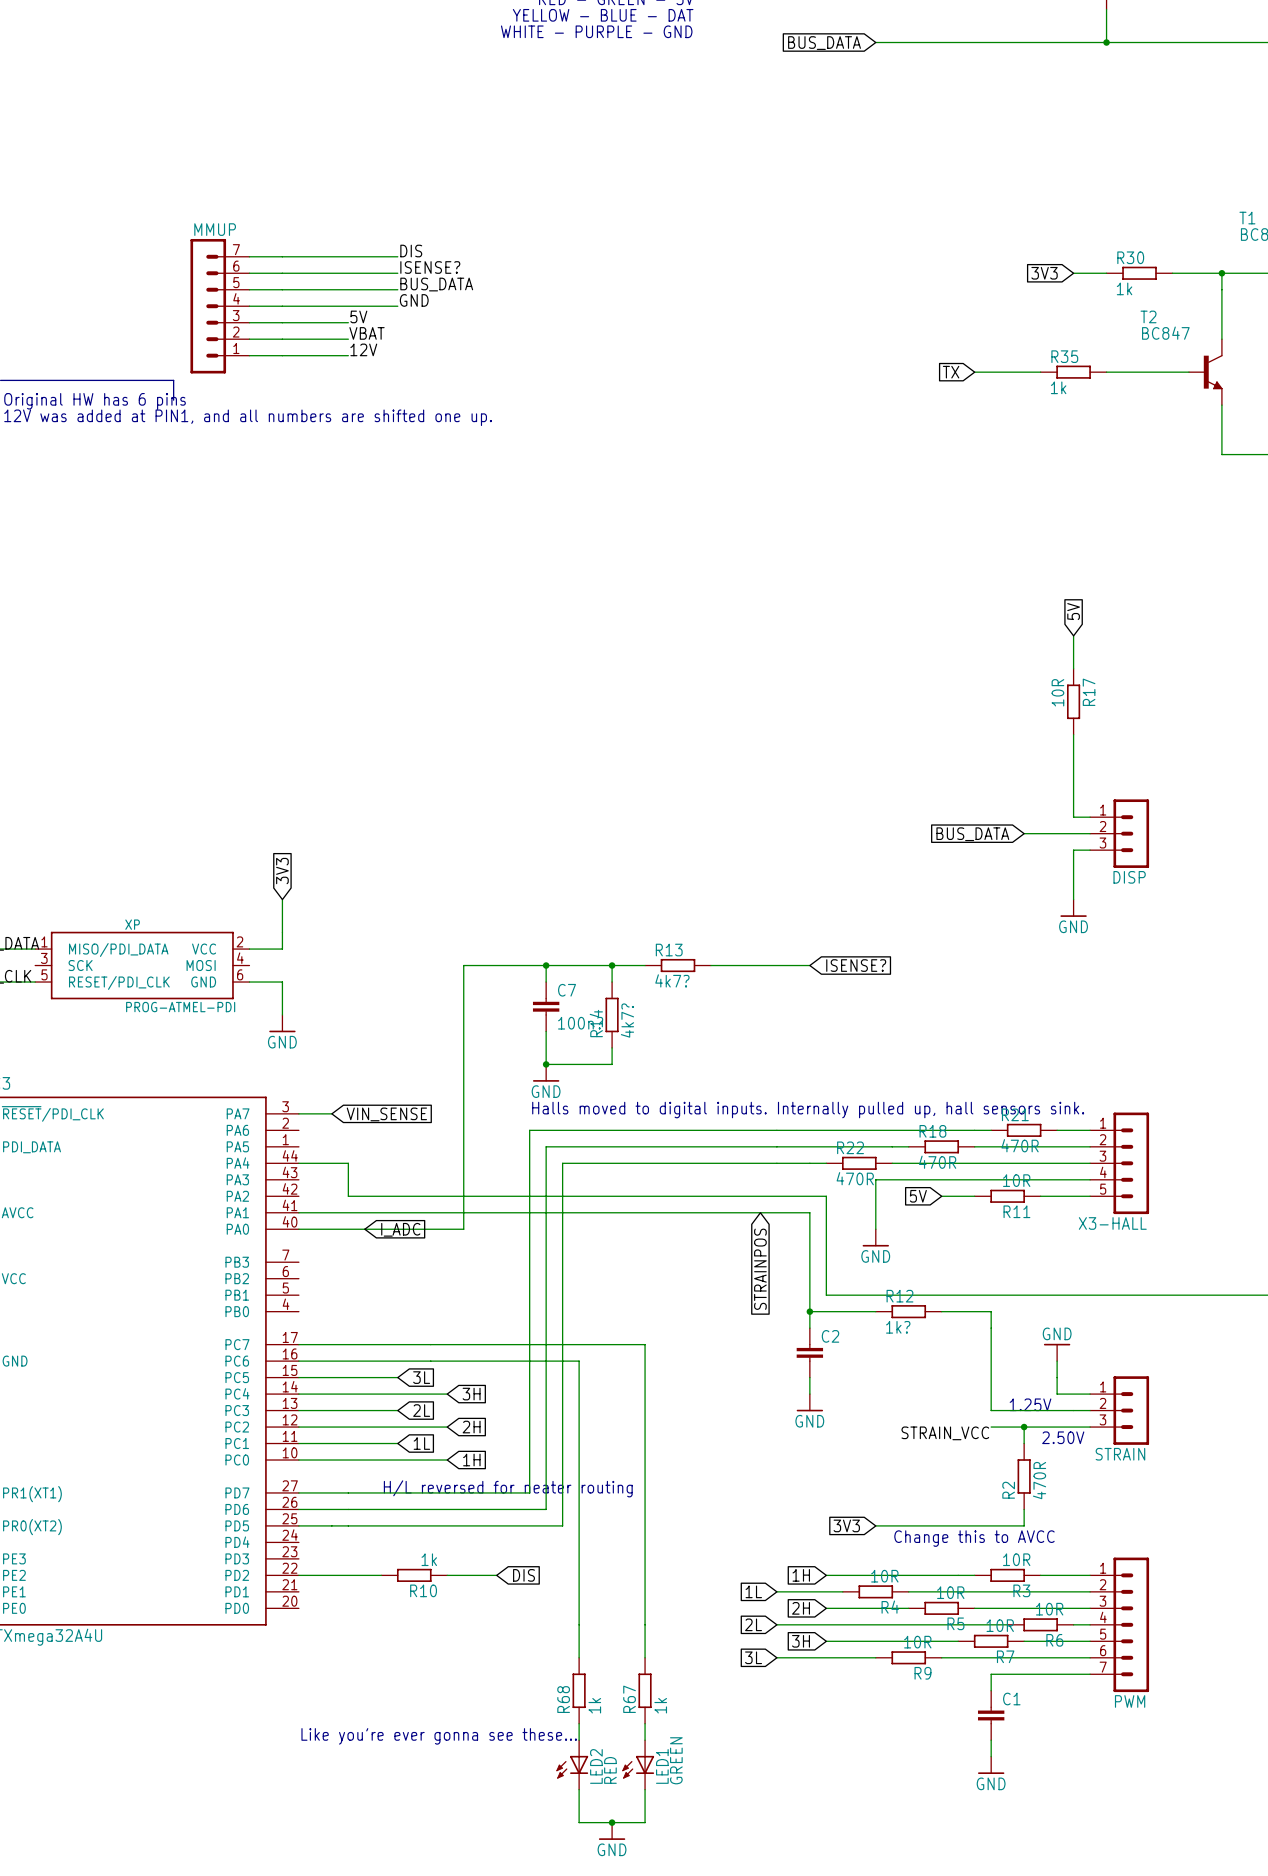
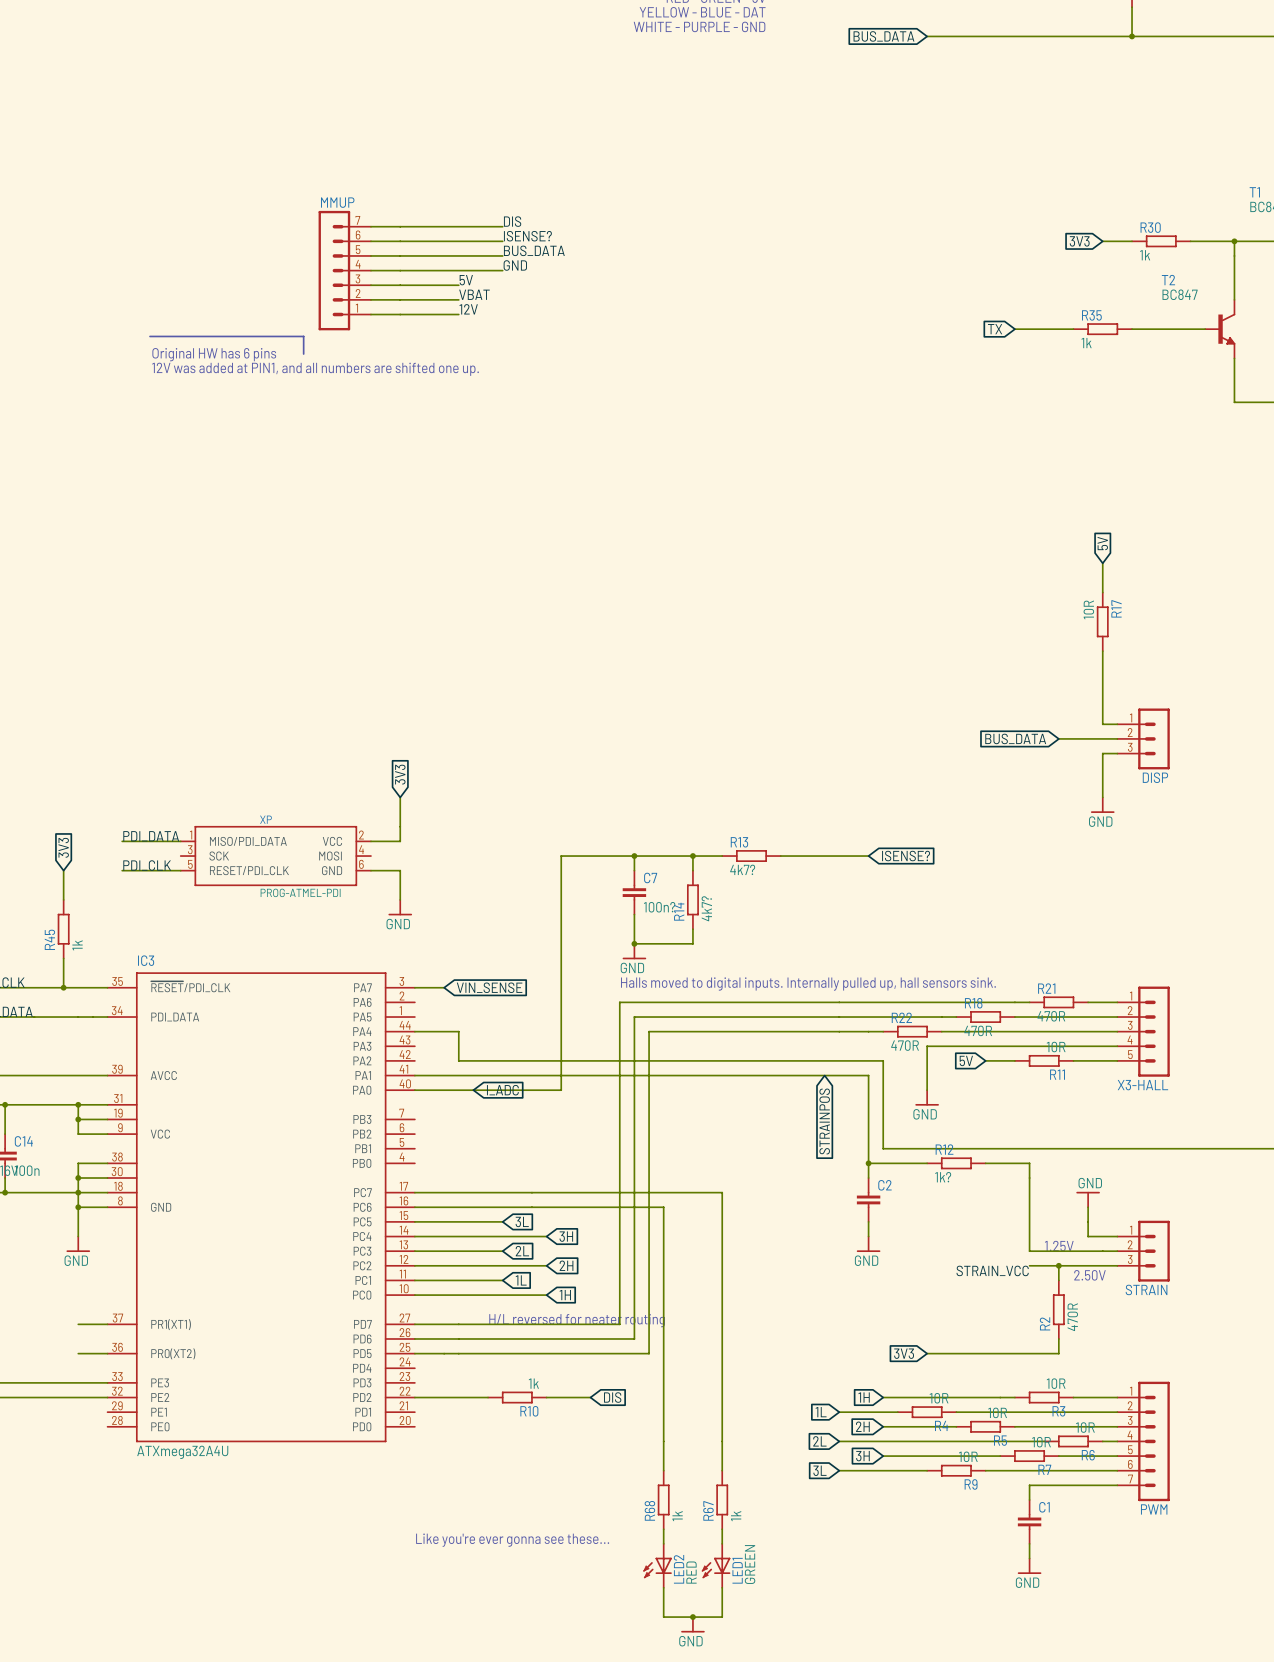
text: Change this to AVCC (974, 1538) -> none

